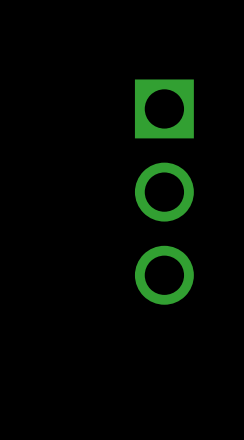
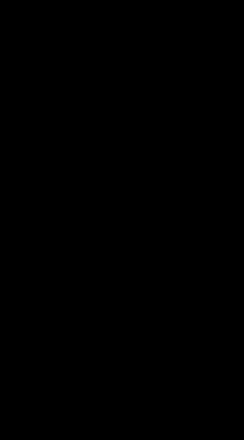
part: (164, 192) -> none

